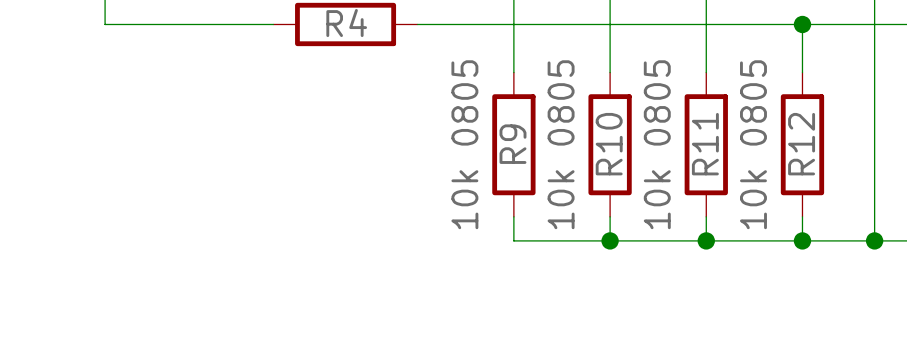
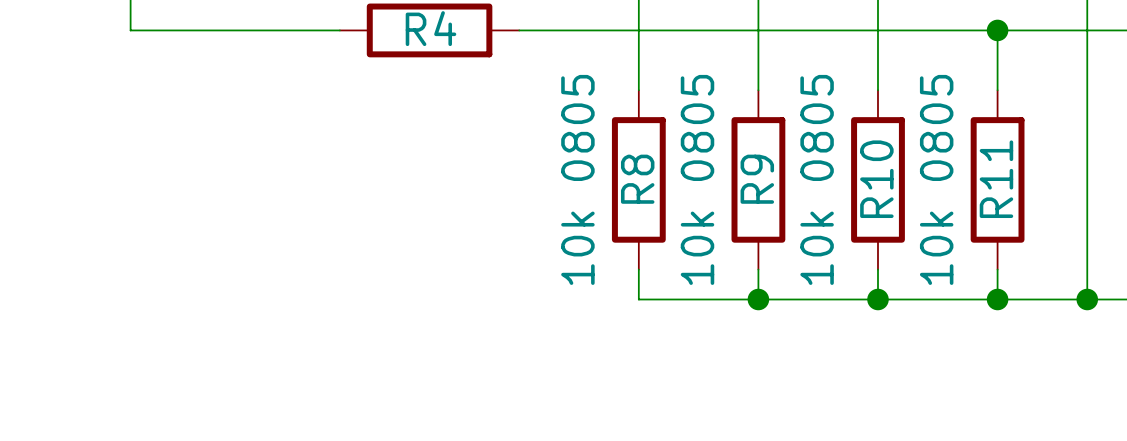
R9 name: R9 (512, 144) -> R8 (637, 179)
R10 name: R10 (609, 144) -> R9 (757, 179)
R11 name: R11 (705, 144) -> R10 (876, 179)
R12 name: R12 (801, 144) -> R11 (996, 179)

